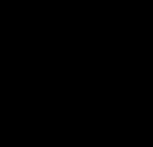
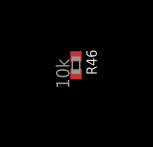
R46: none -> 10k (75, 65)

